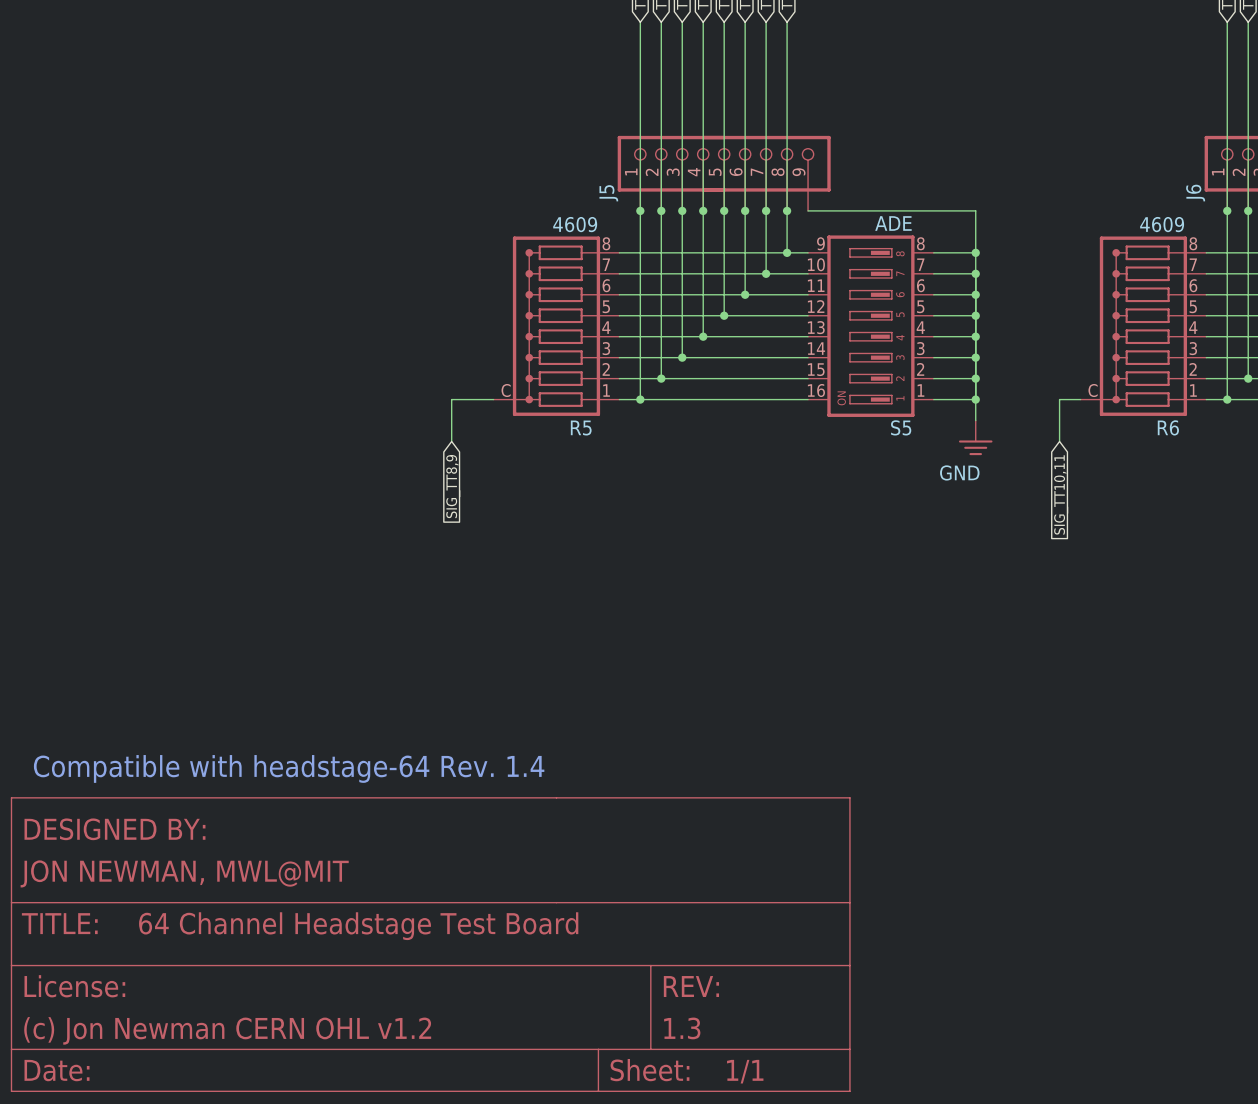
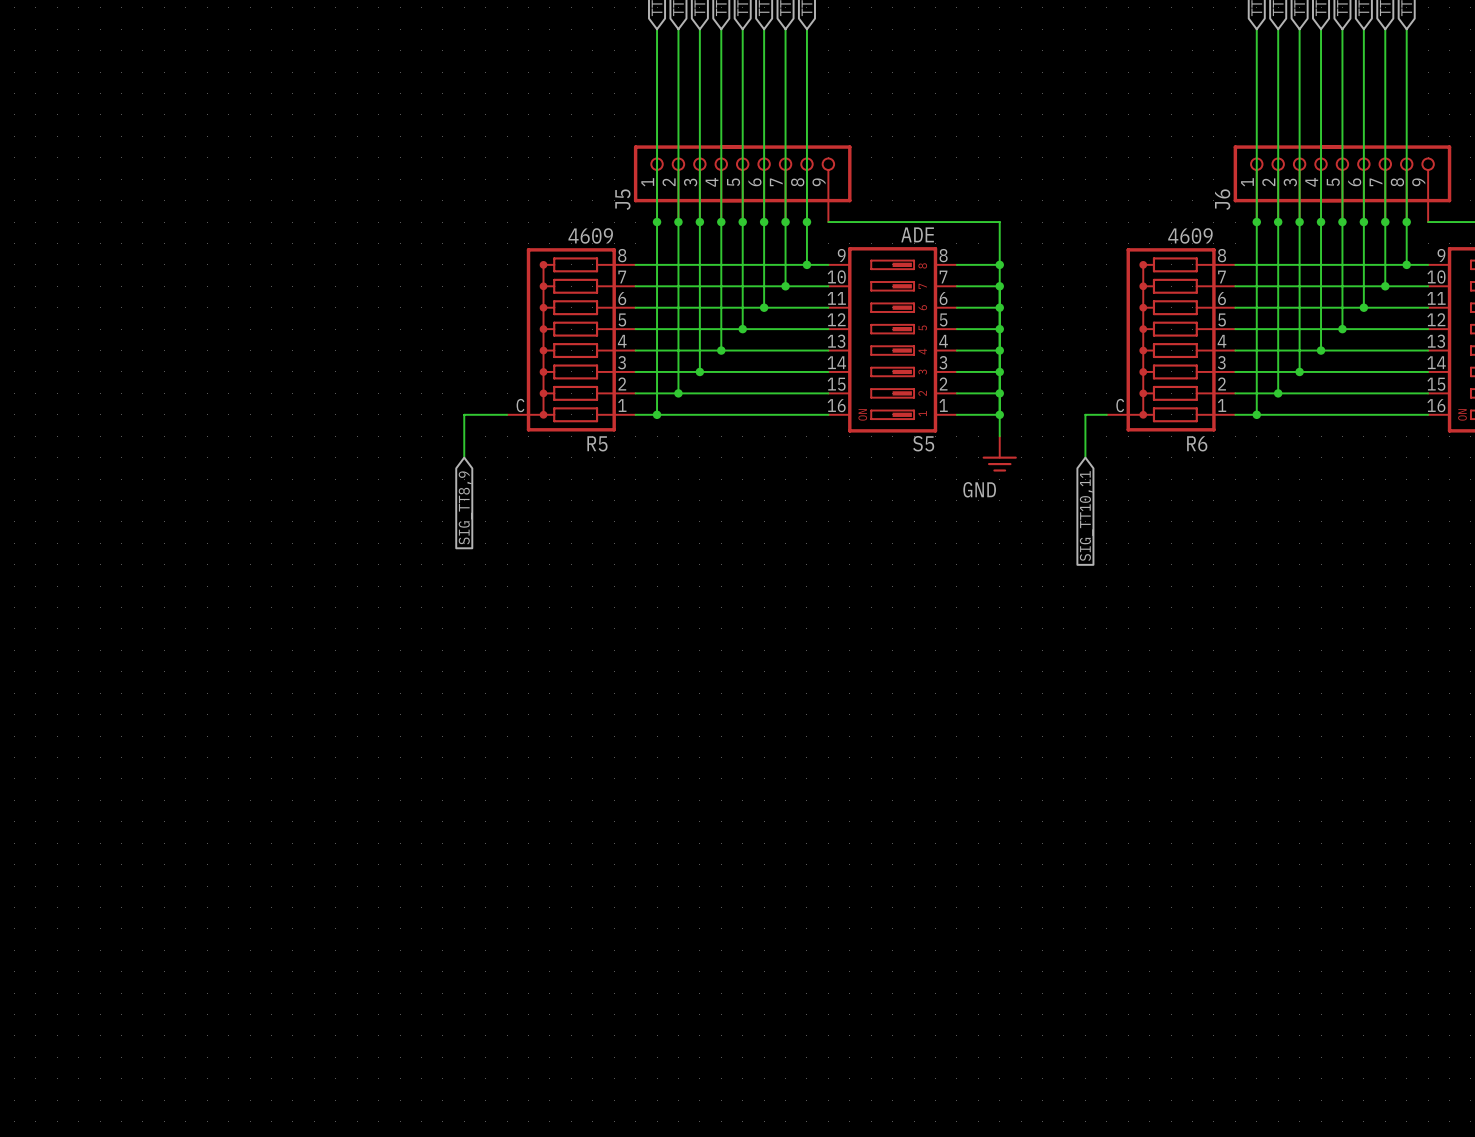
text: Compatible with headstage-64 Rev. 1.4 (289, 768) -> none
part: (430, 944) -> none

